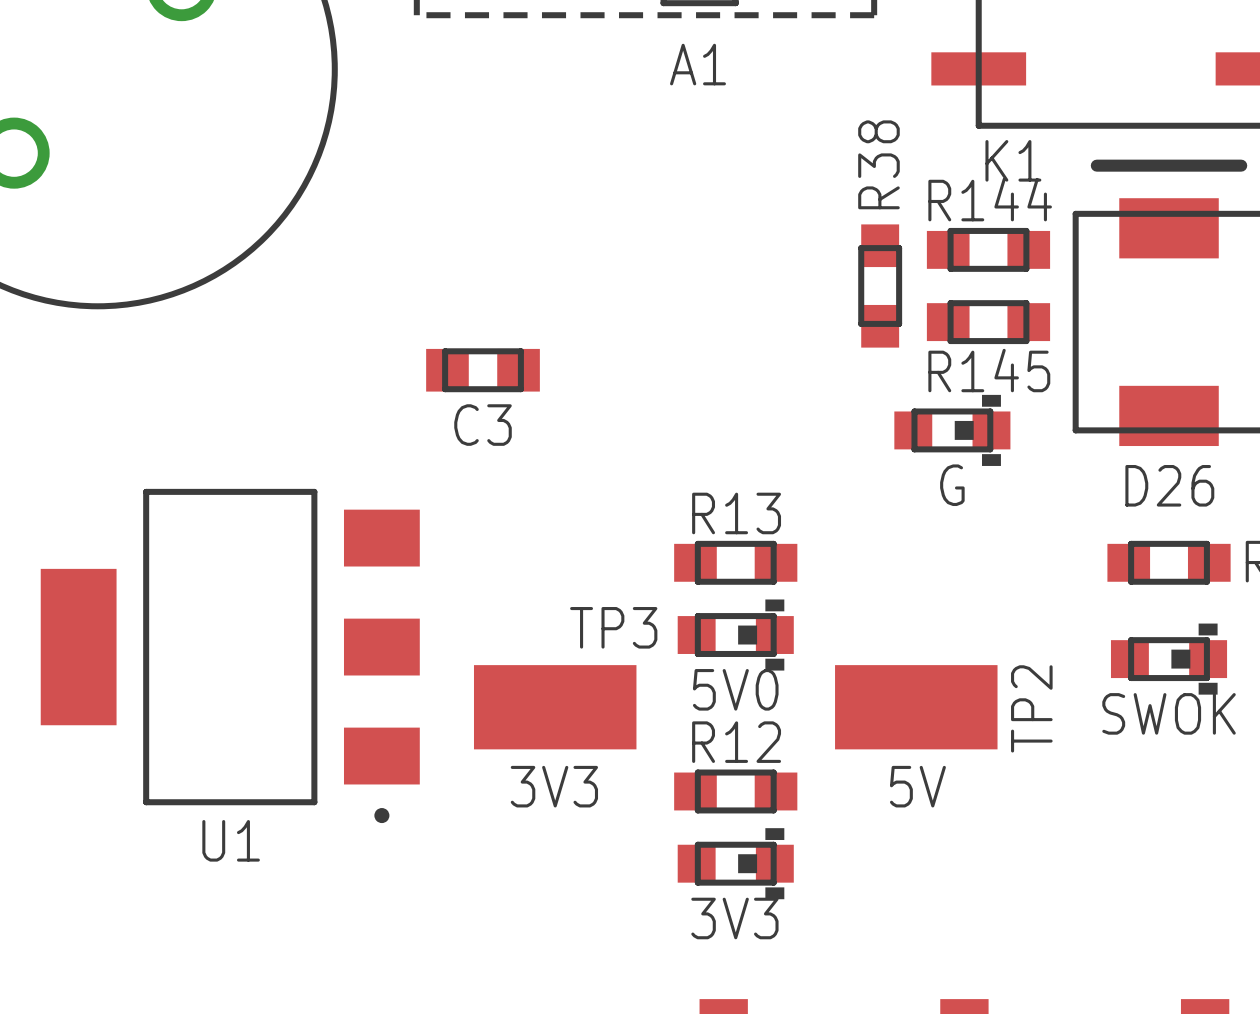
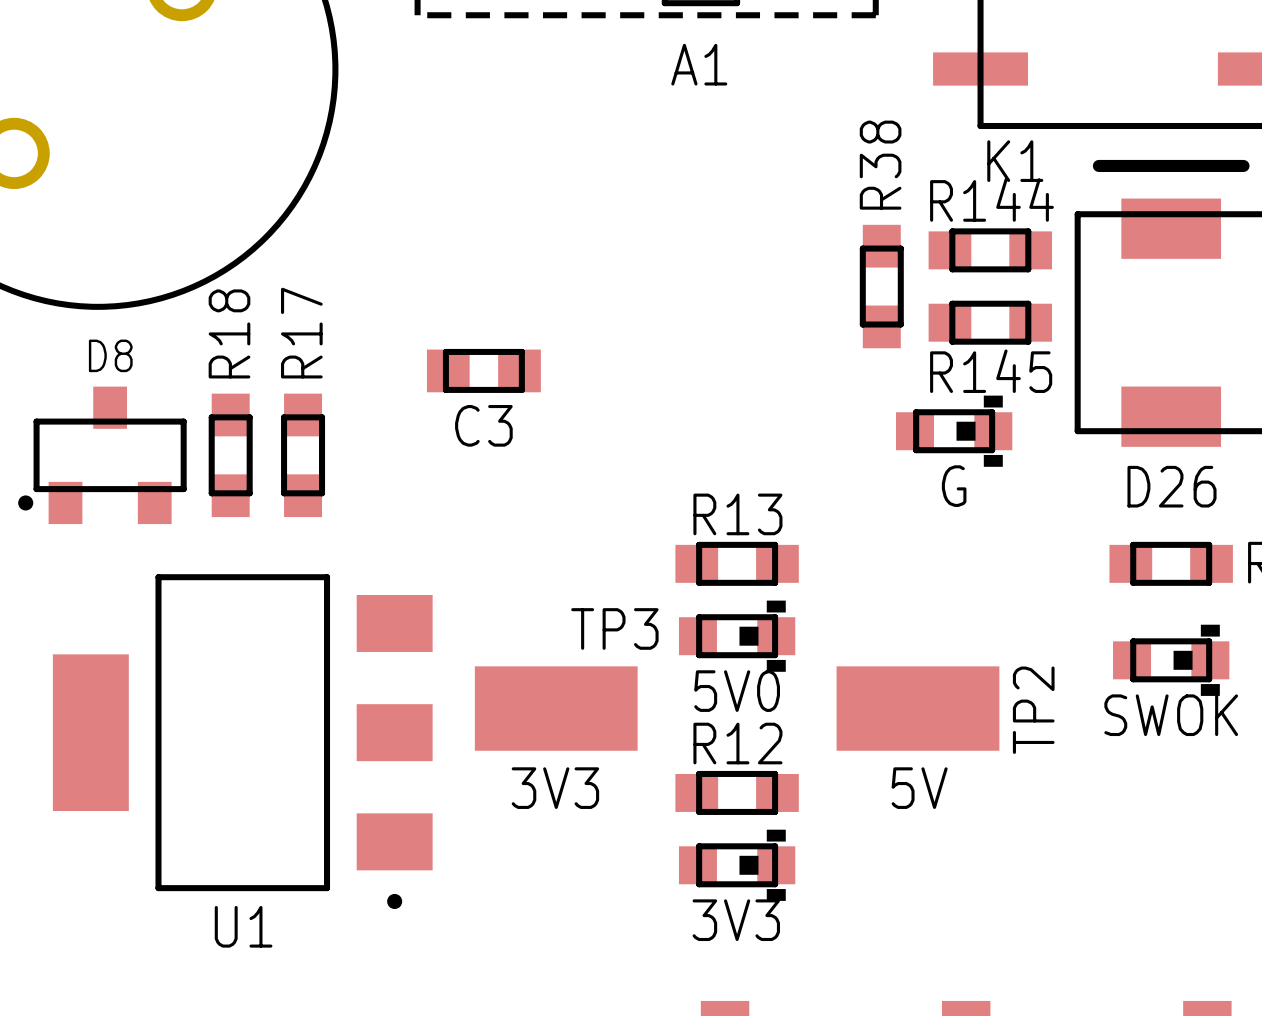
D8: none -> (102, 455)
R18: none -> (230, 455)
R17: none -> (303, 455)
U1 position: (230, 655) -> (242, 741)

